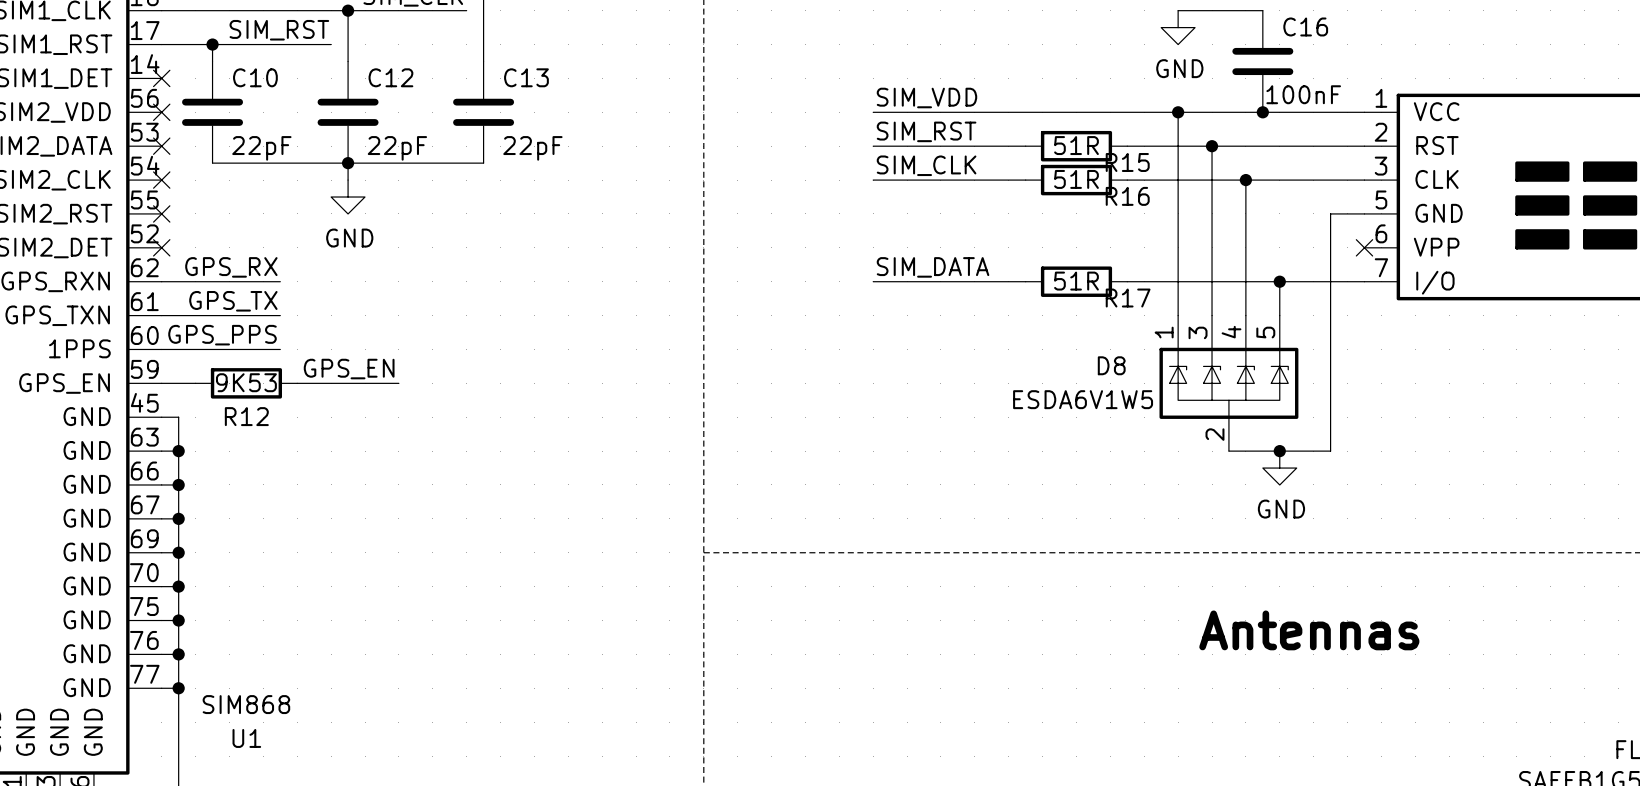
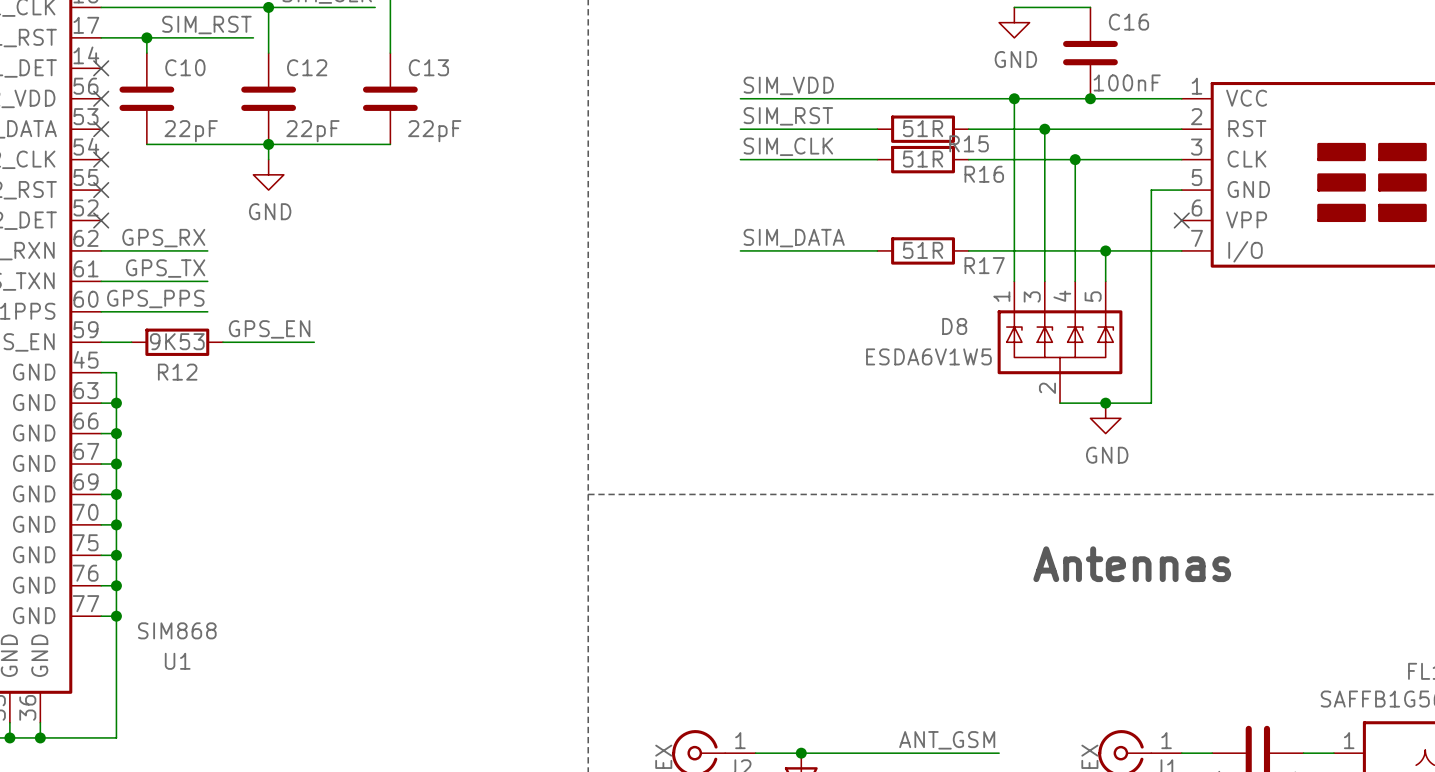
R16 name position: R16 (1127, 196) -> R16 (984, 174)
R17 name position: R17 (1128, 298) -> R17 (984, 265)

